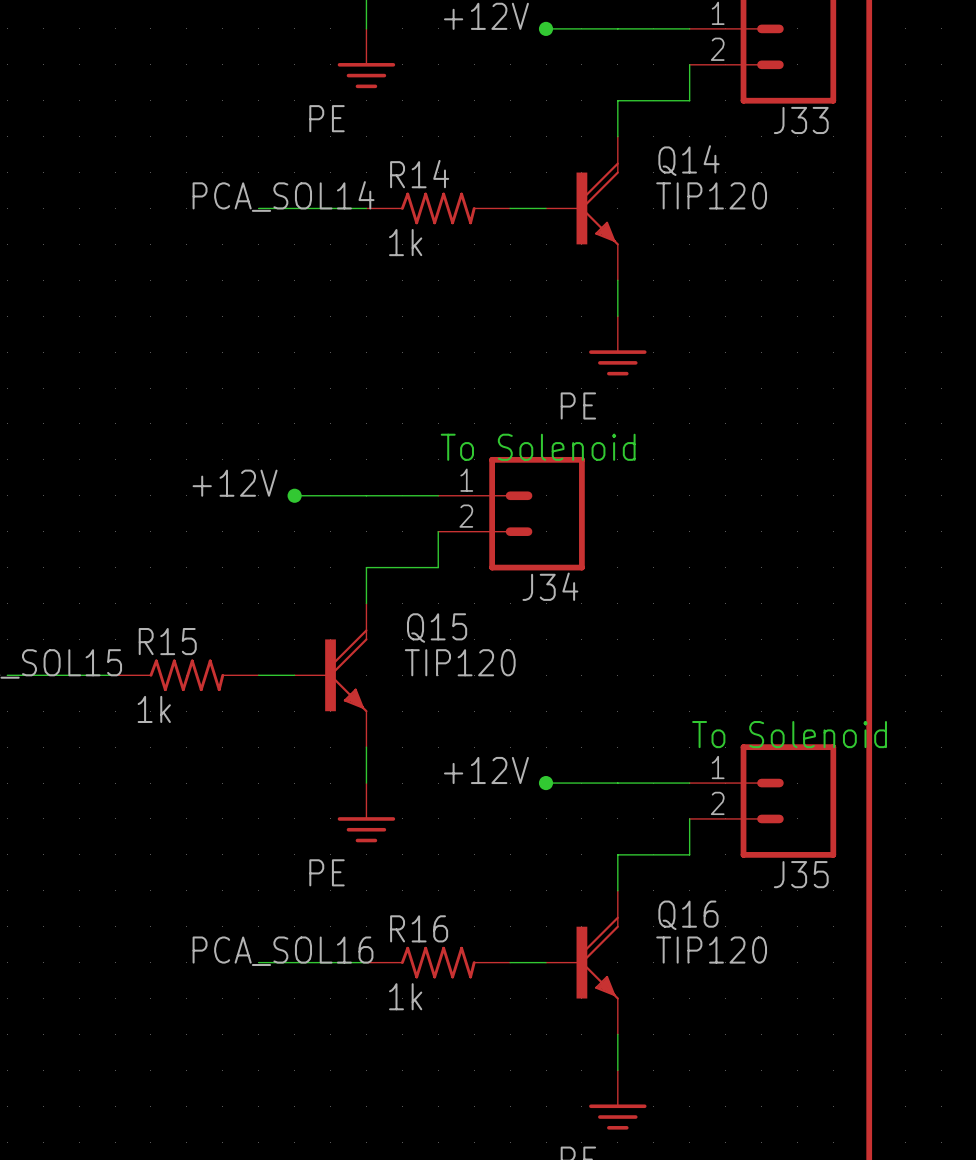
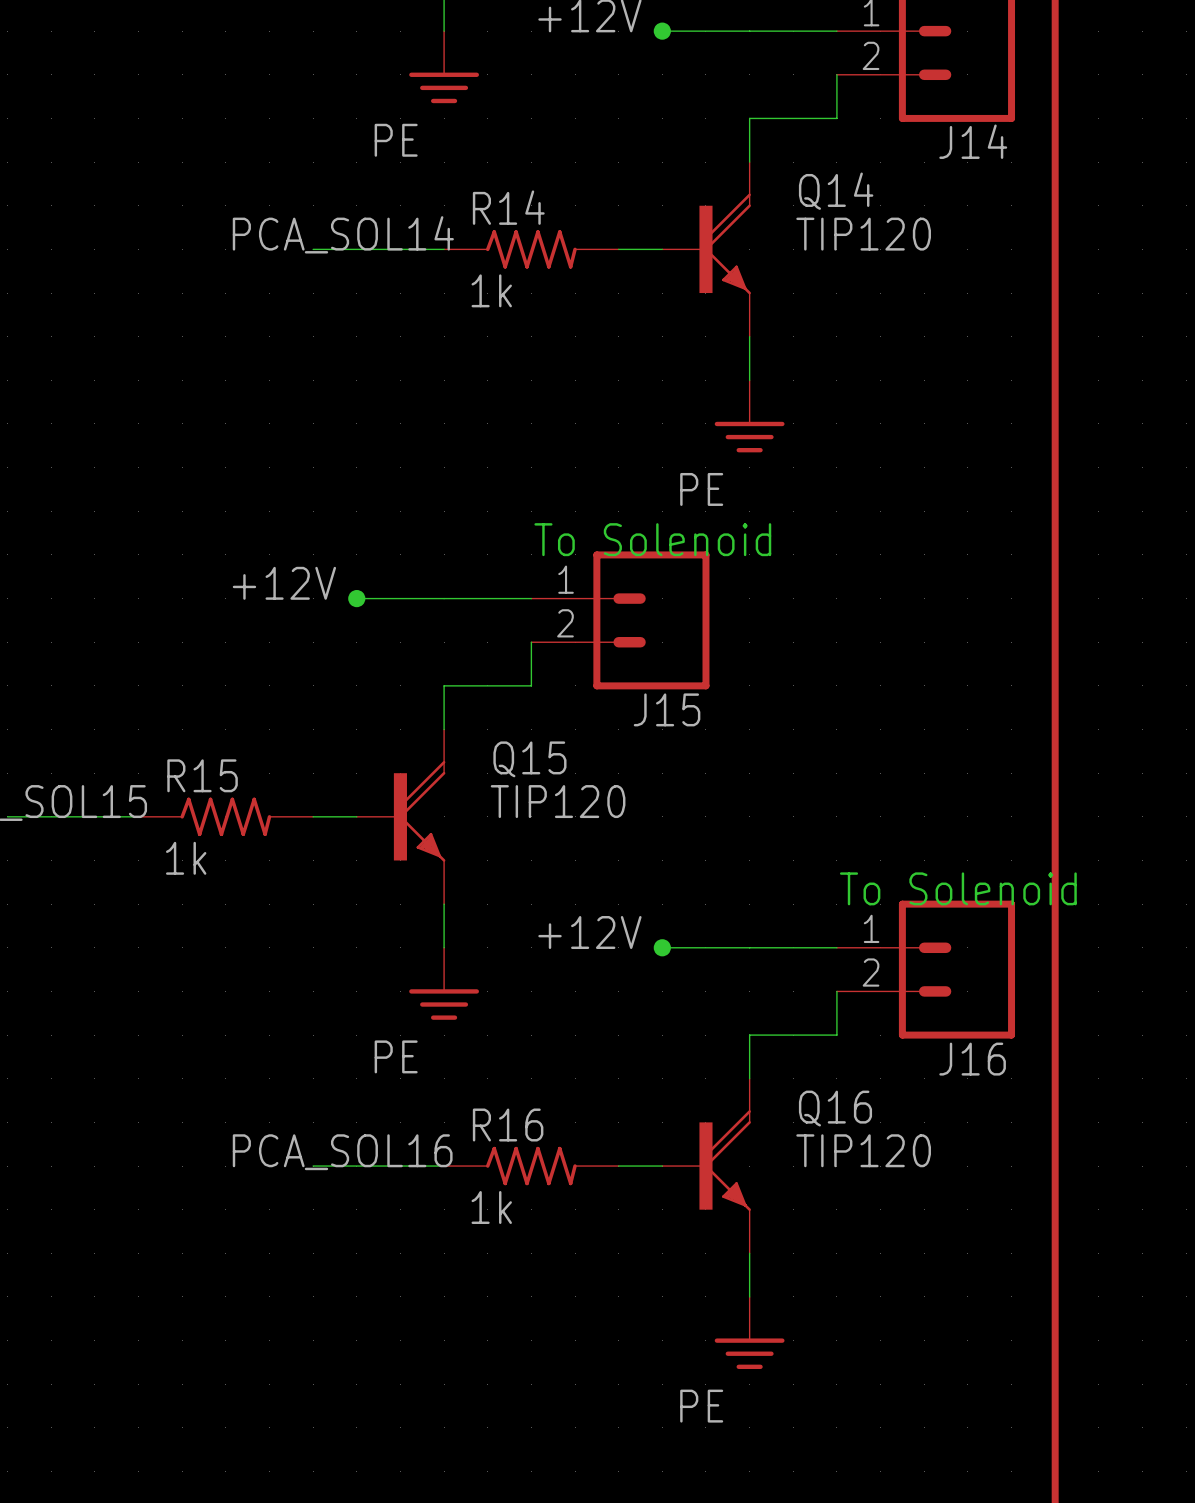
J33 name: J33 (801, 120) -> J14 (973, 141)
J34 name: J34 (550, 586) -> J15 (667, 709)
J35 name: J35 (801, 874) -> J16 (972, 1059)

